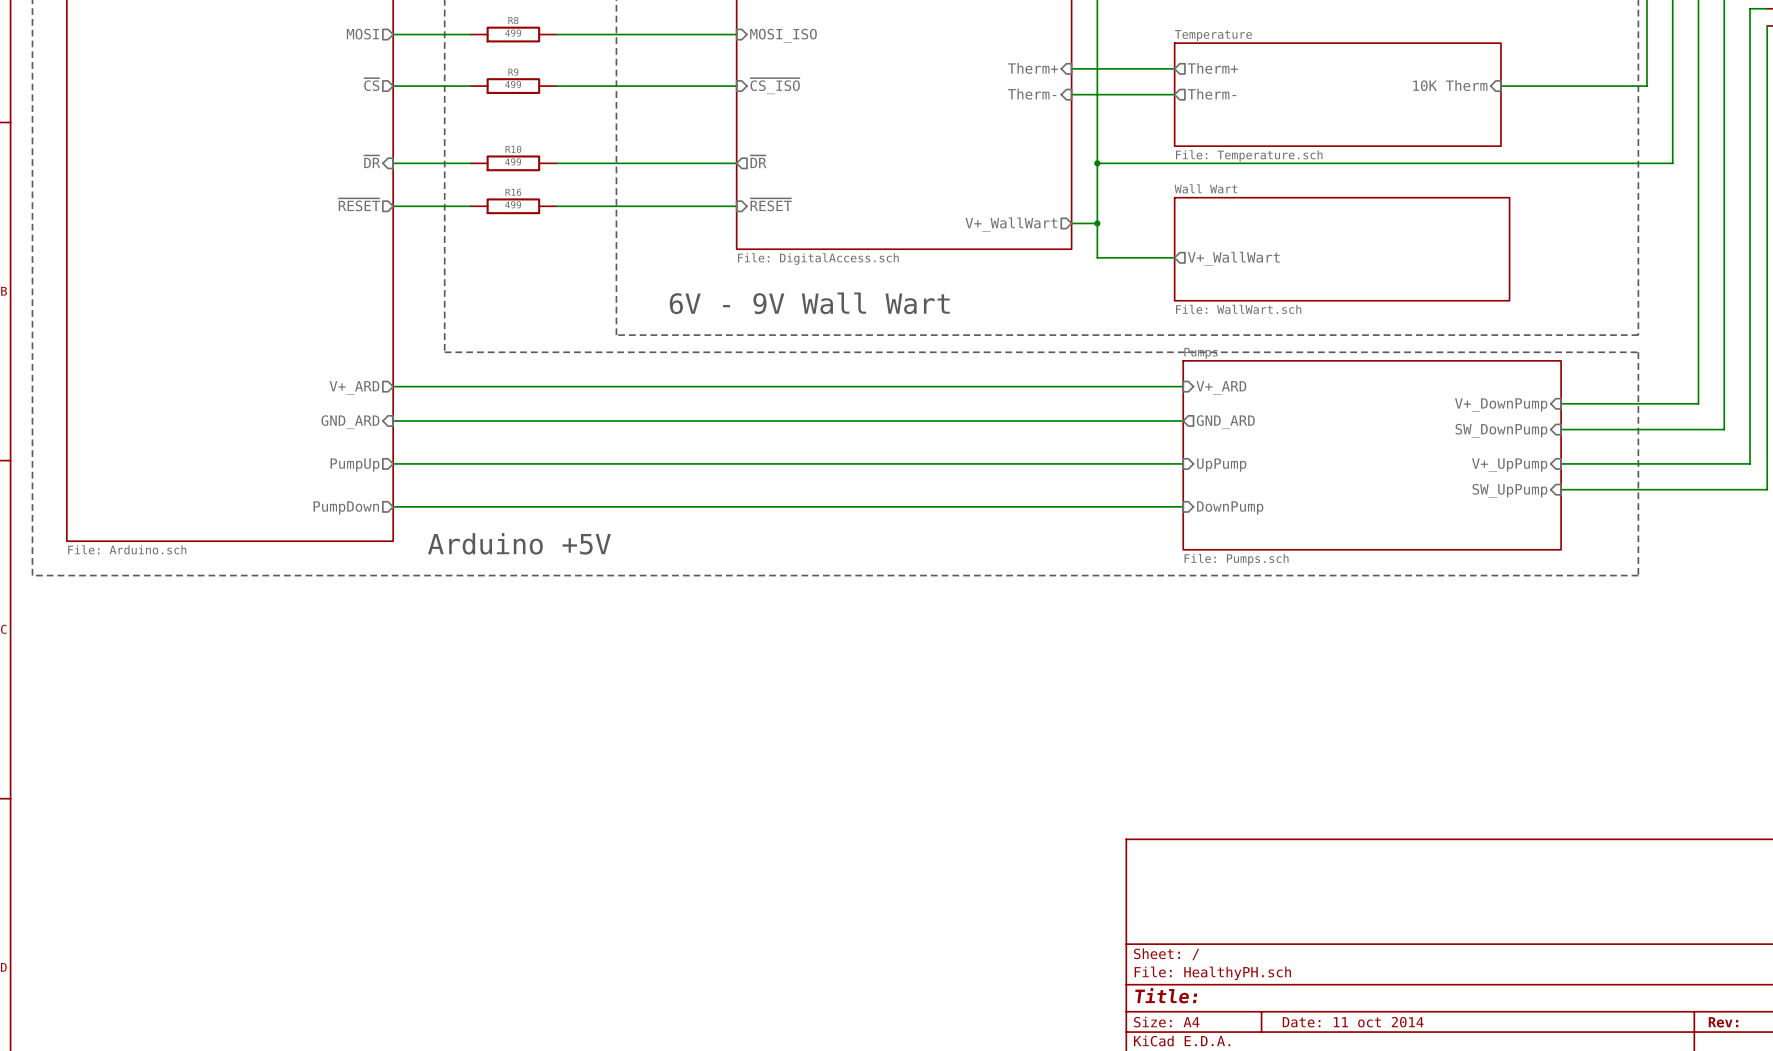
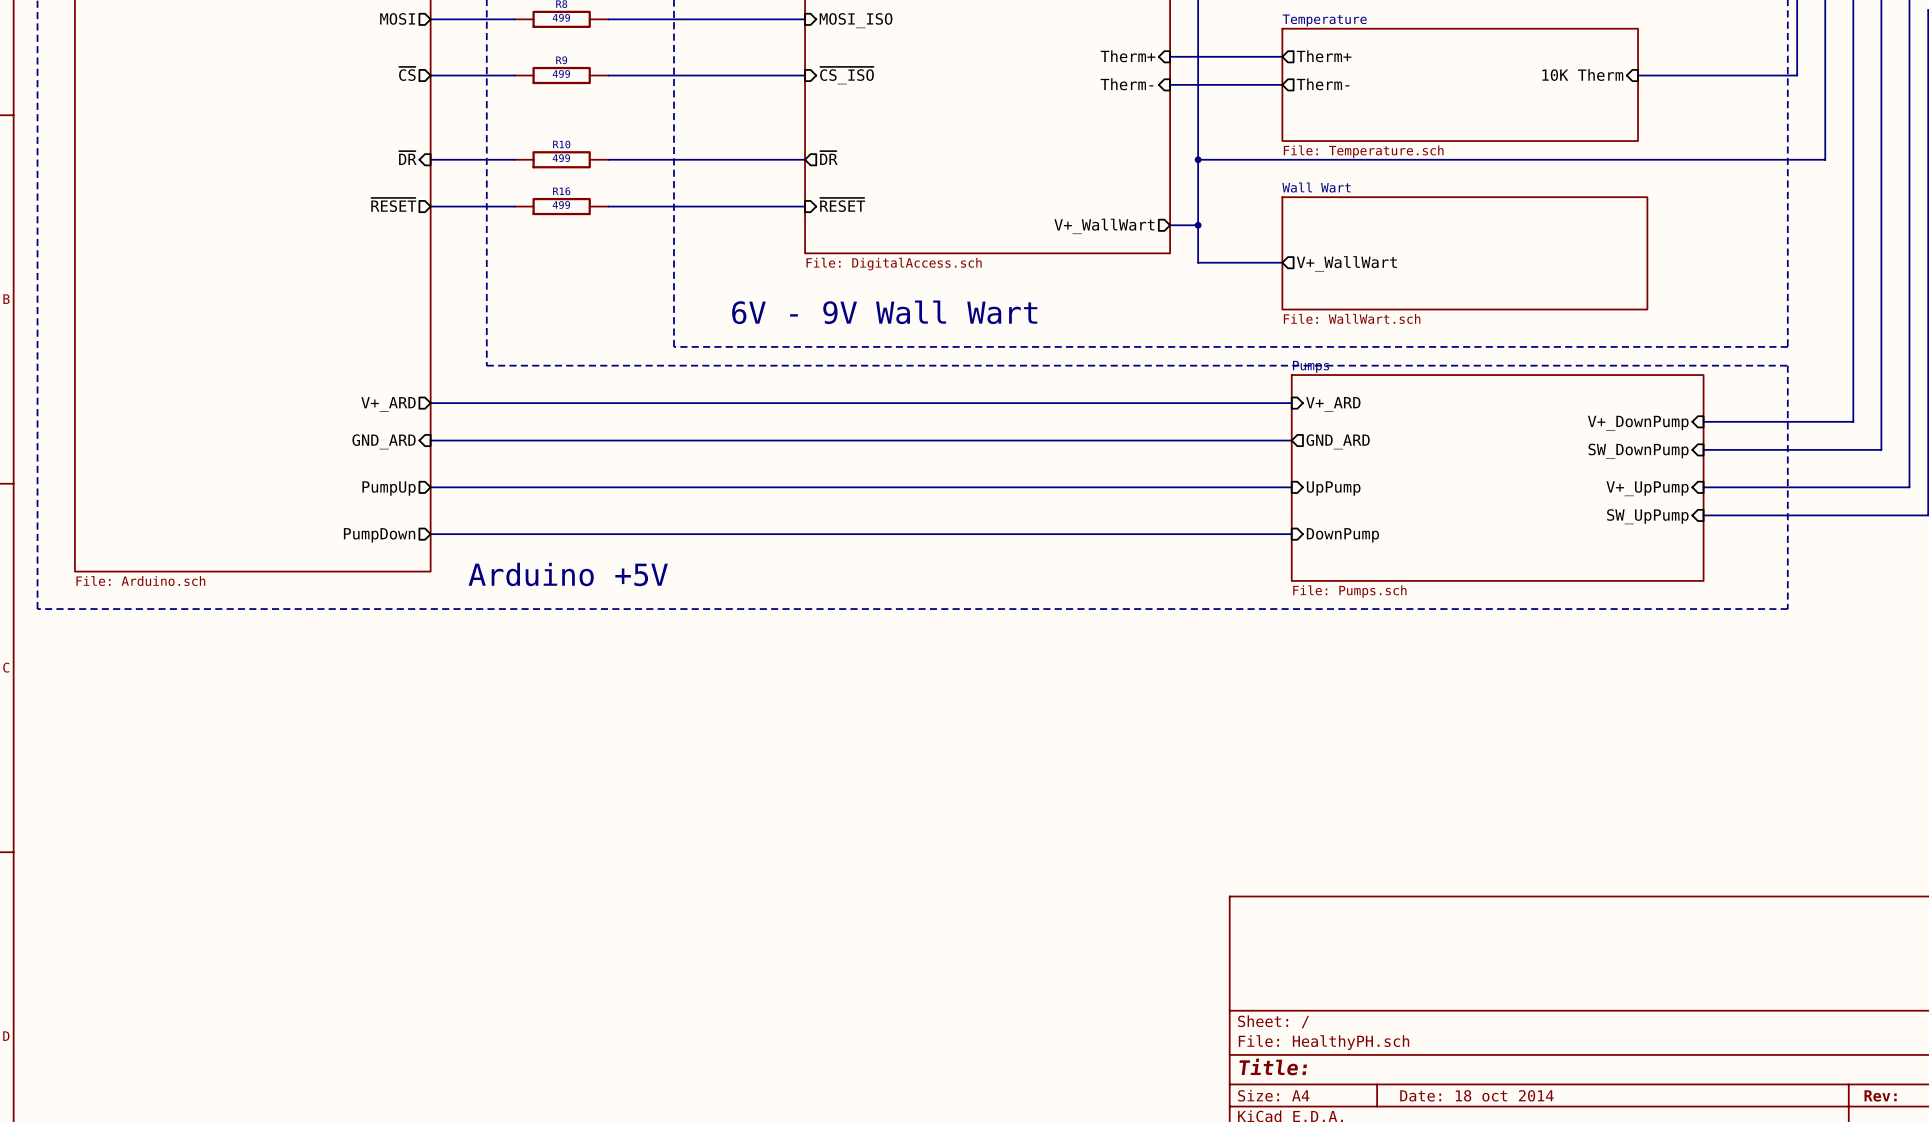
title block: Date: 11 oct 2014 (1353, 1022) -> Date: 18 oct 2014 (1476, 1095)

